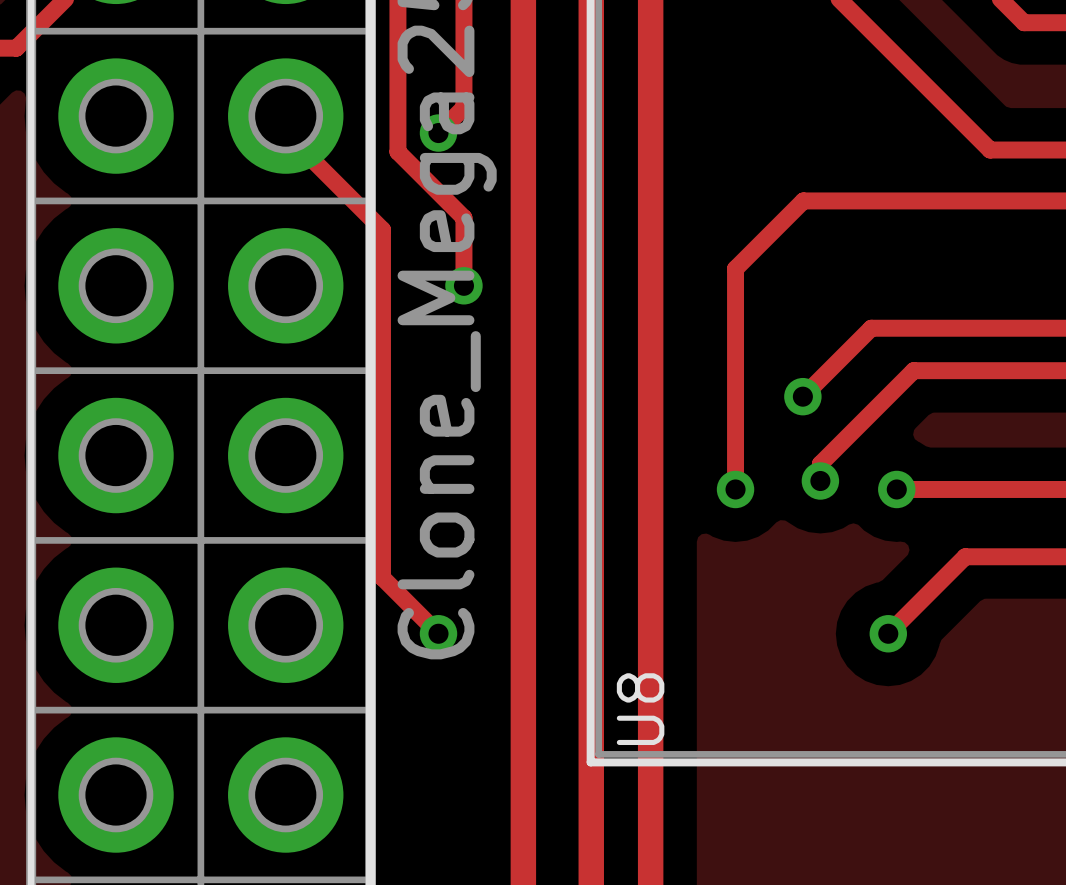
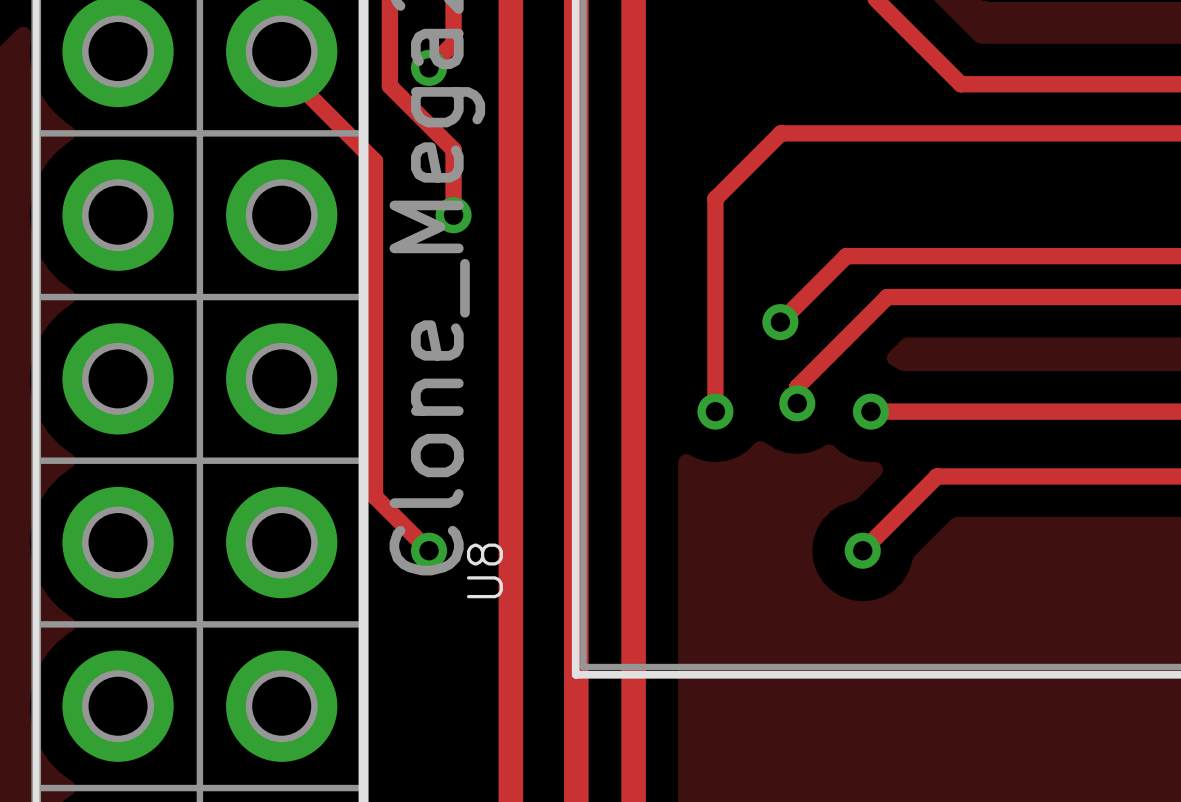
U8 name position: U8 (640, 709) -> U8 (484, 570)

